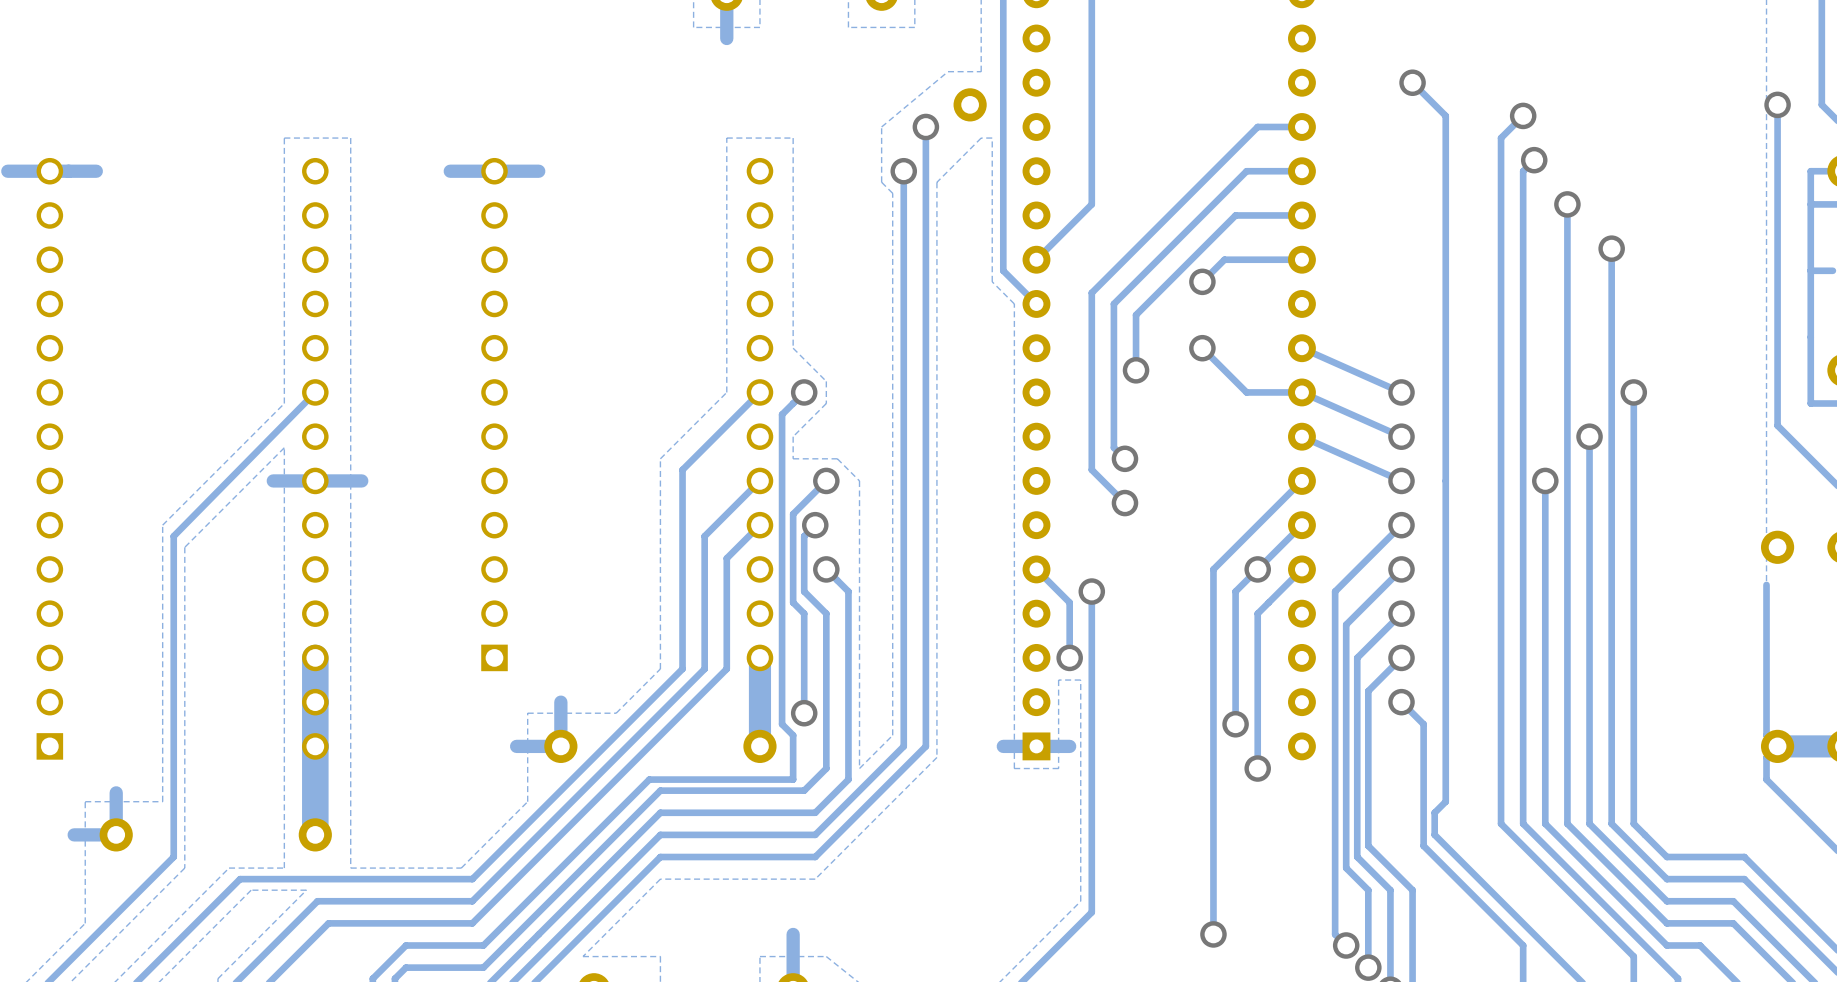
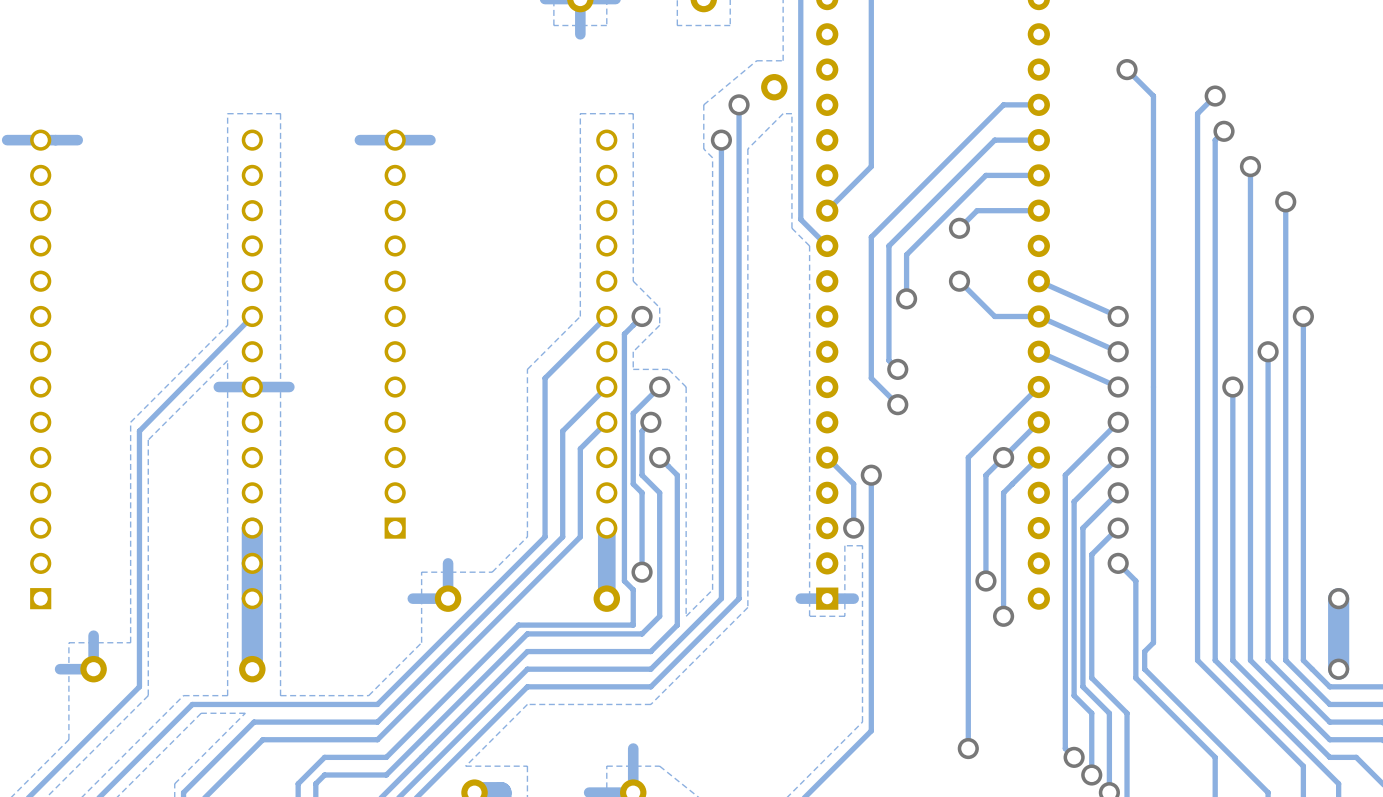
track: none -> (1338, 598) (1338, 669)
via: none -> (1338, 598)
via: none -> (1338, 669)

